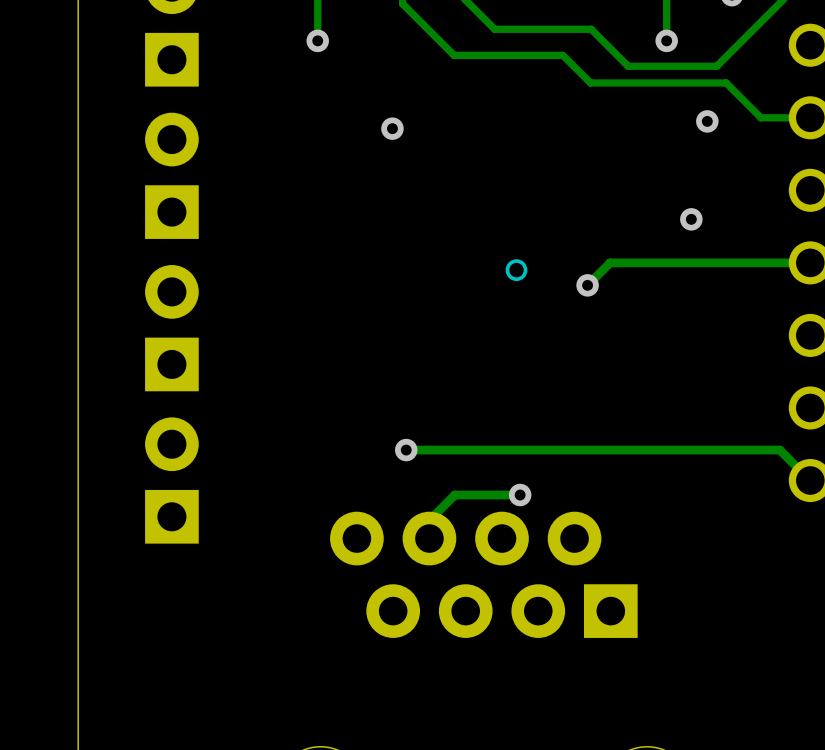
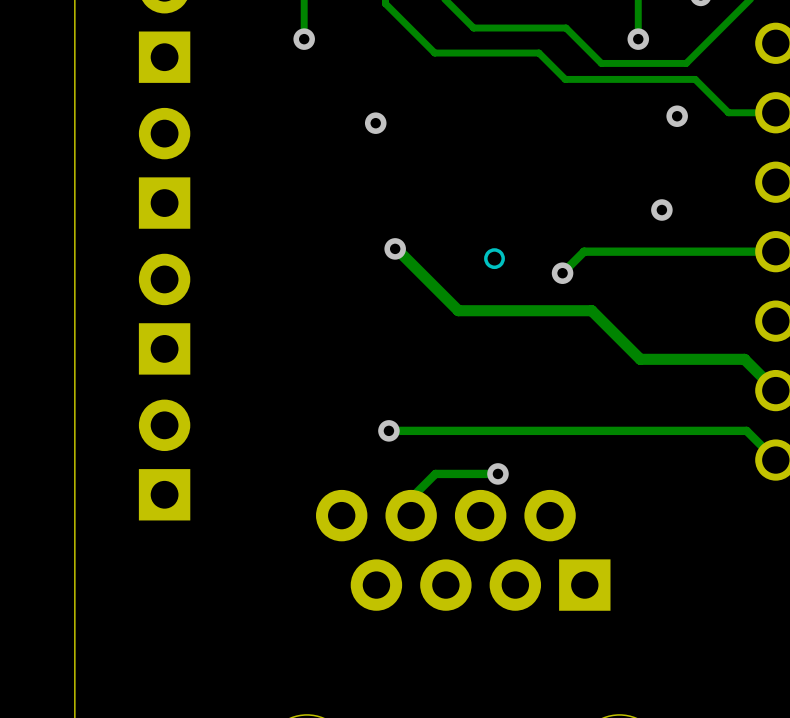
track: none -> (395, 248) (458, 310) (591, 310) (640, 359) (744, 359) (775, 390)
via: none -> (395, 248)

